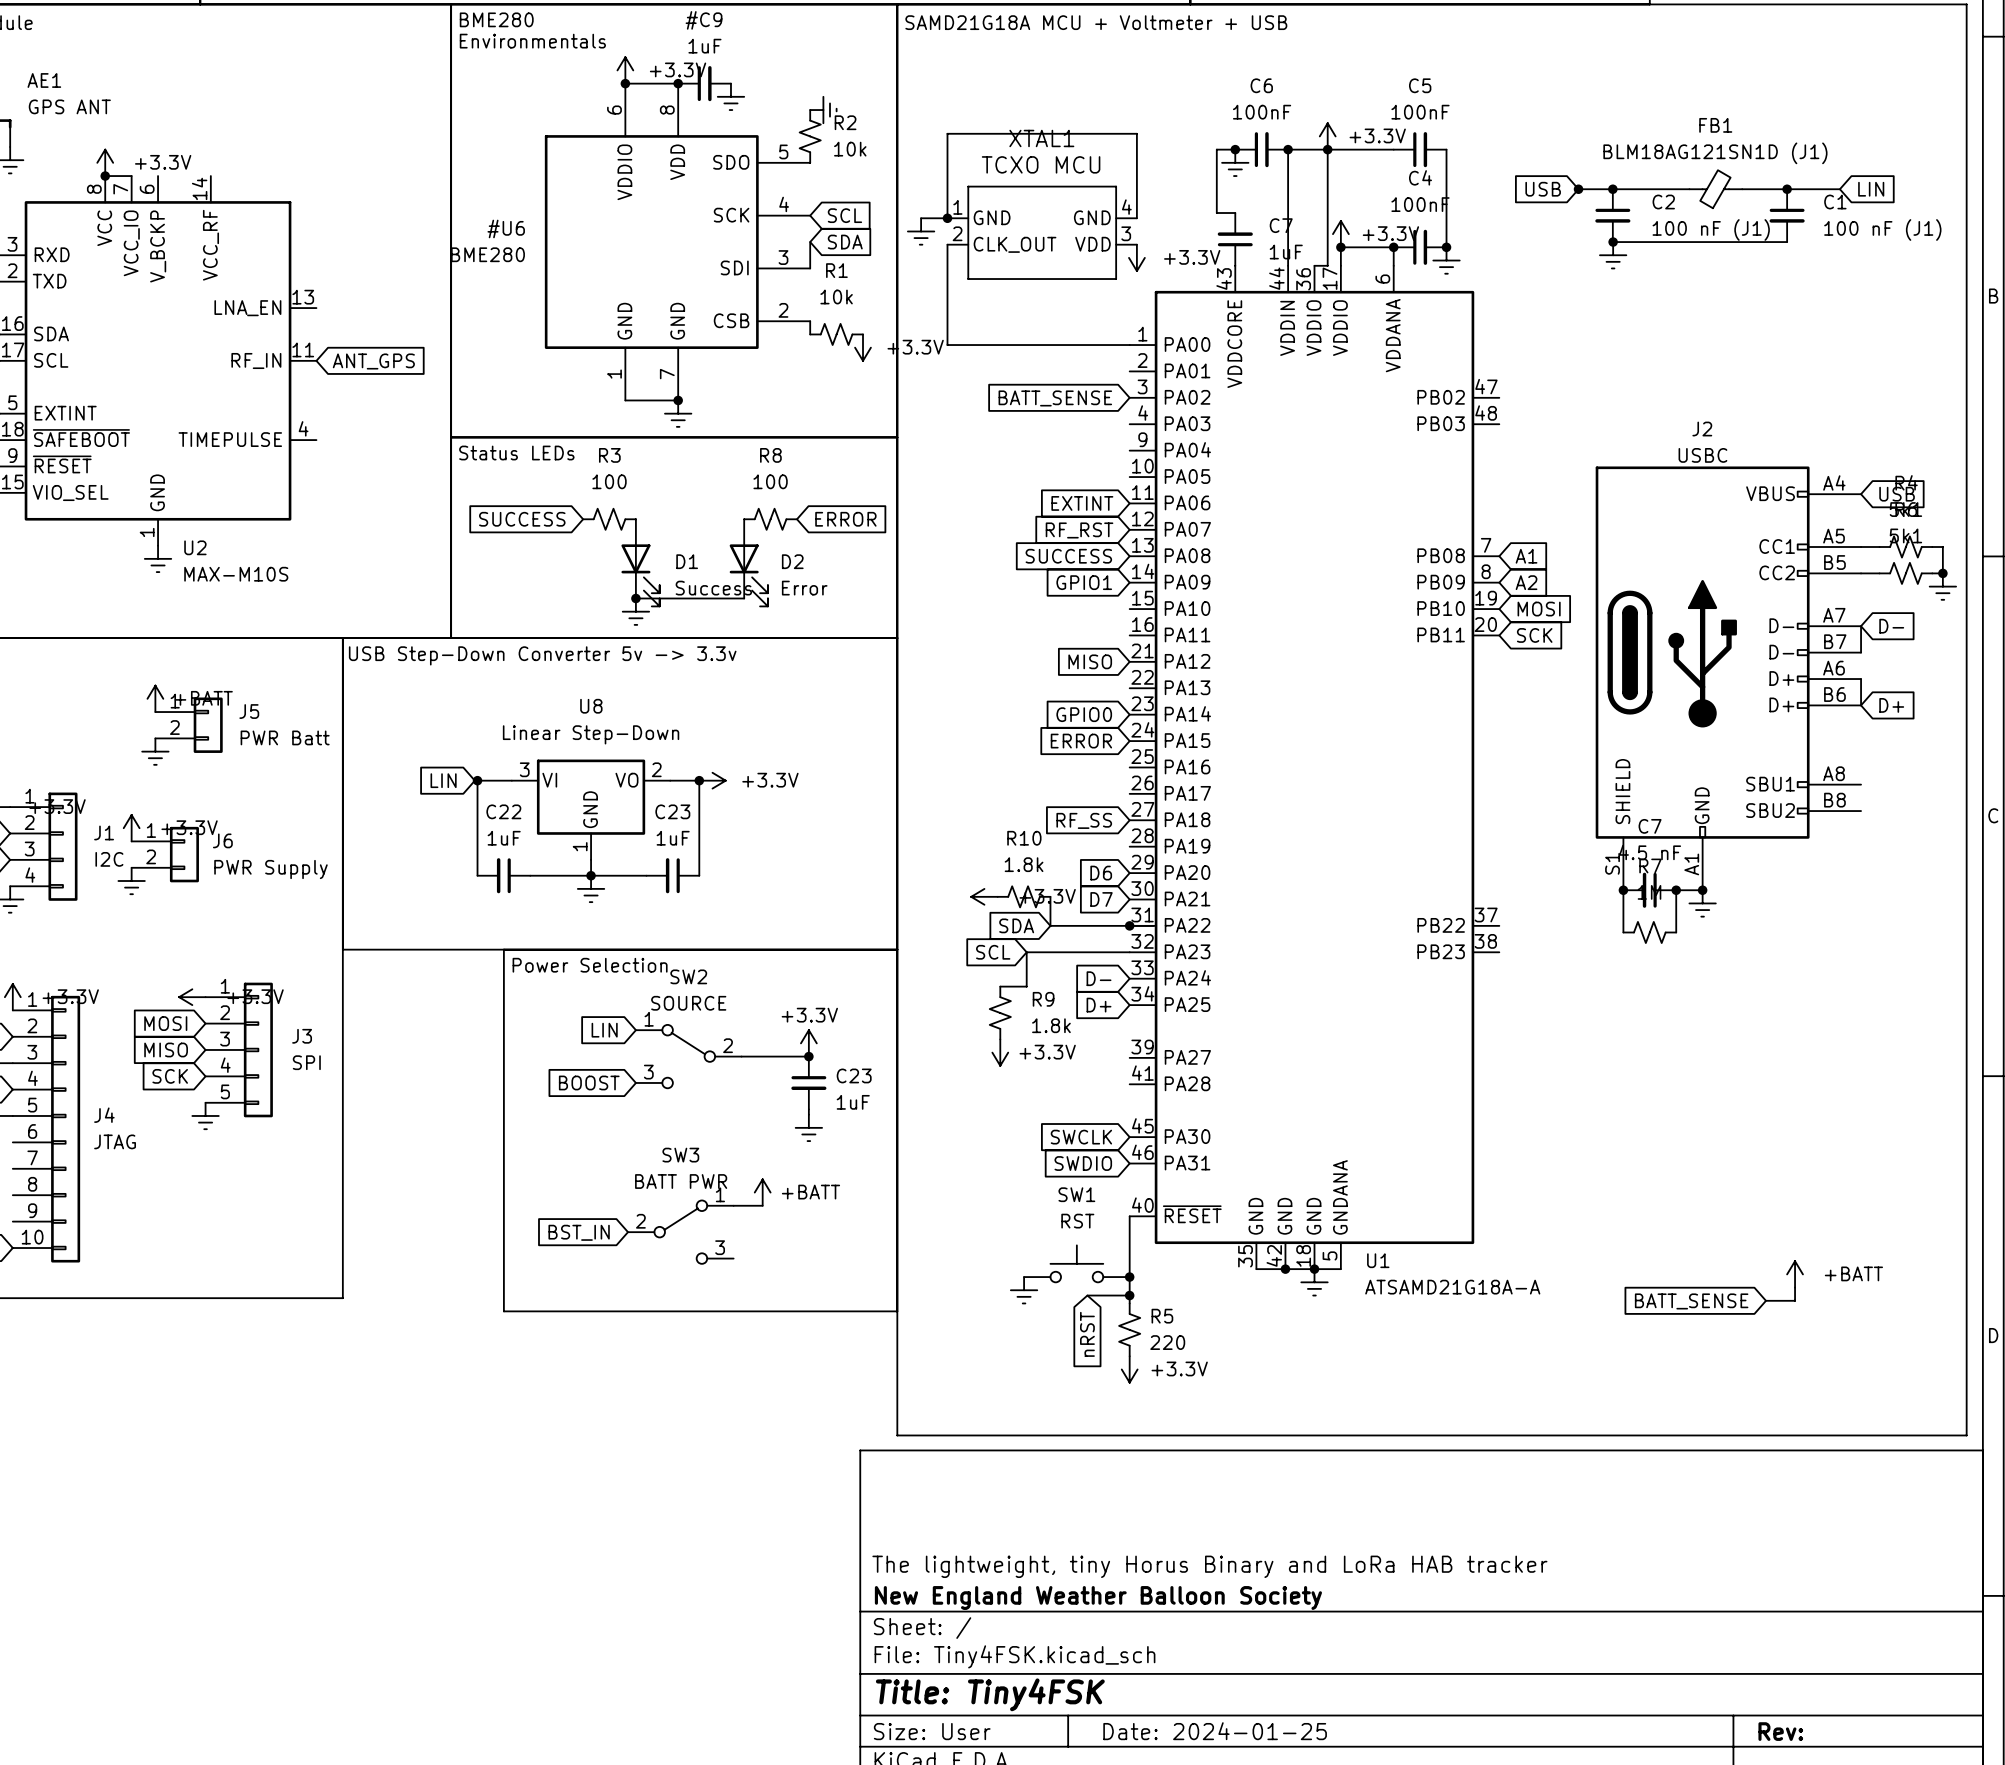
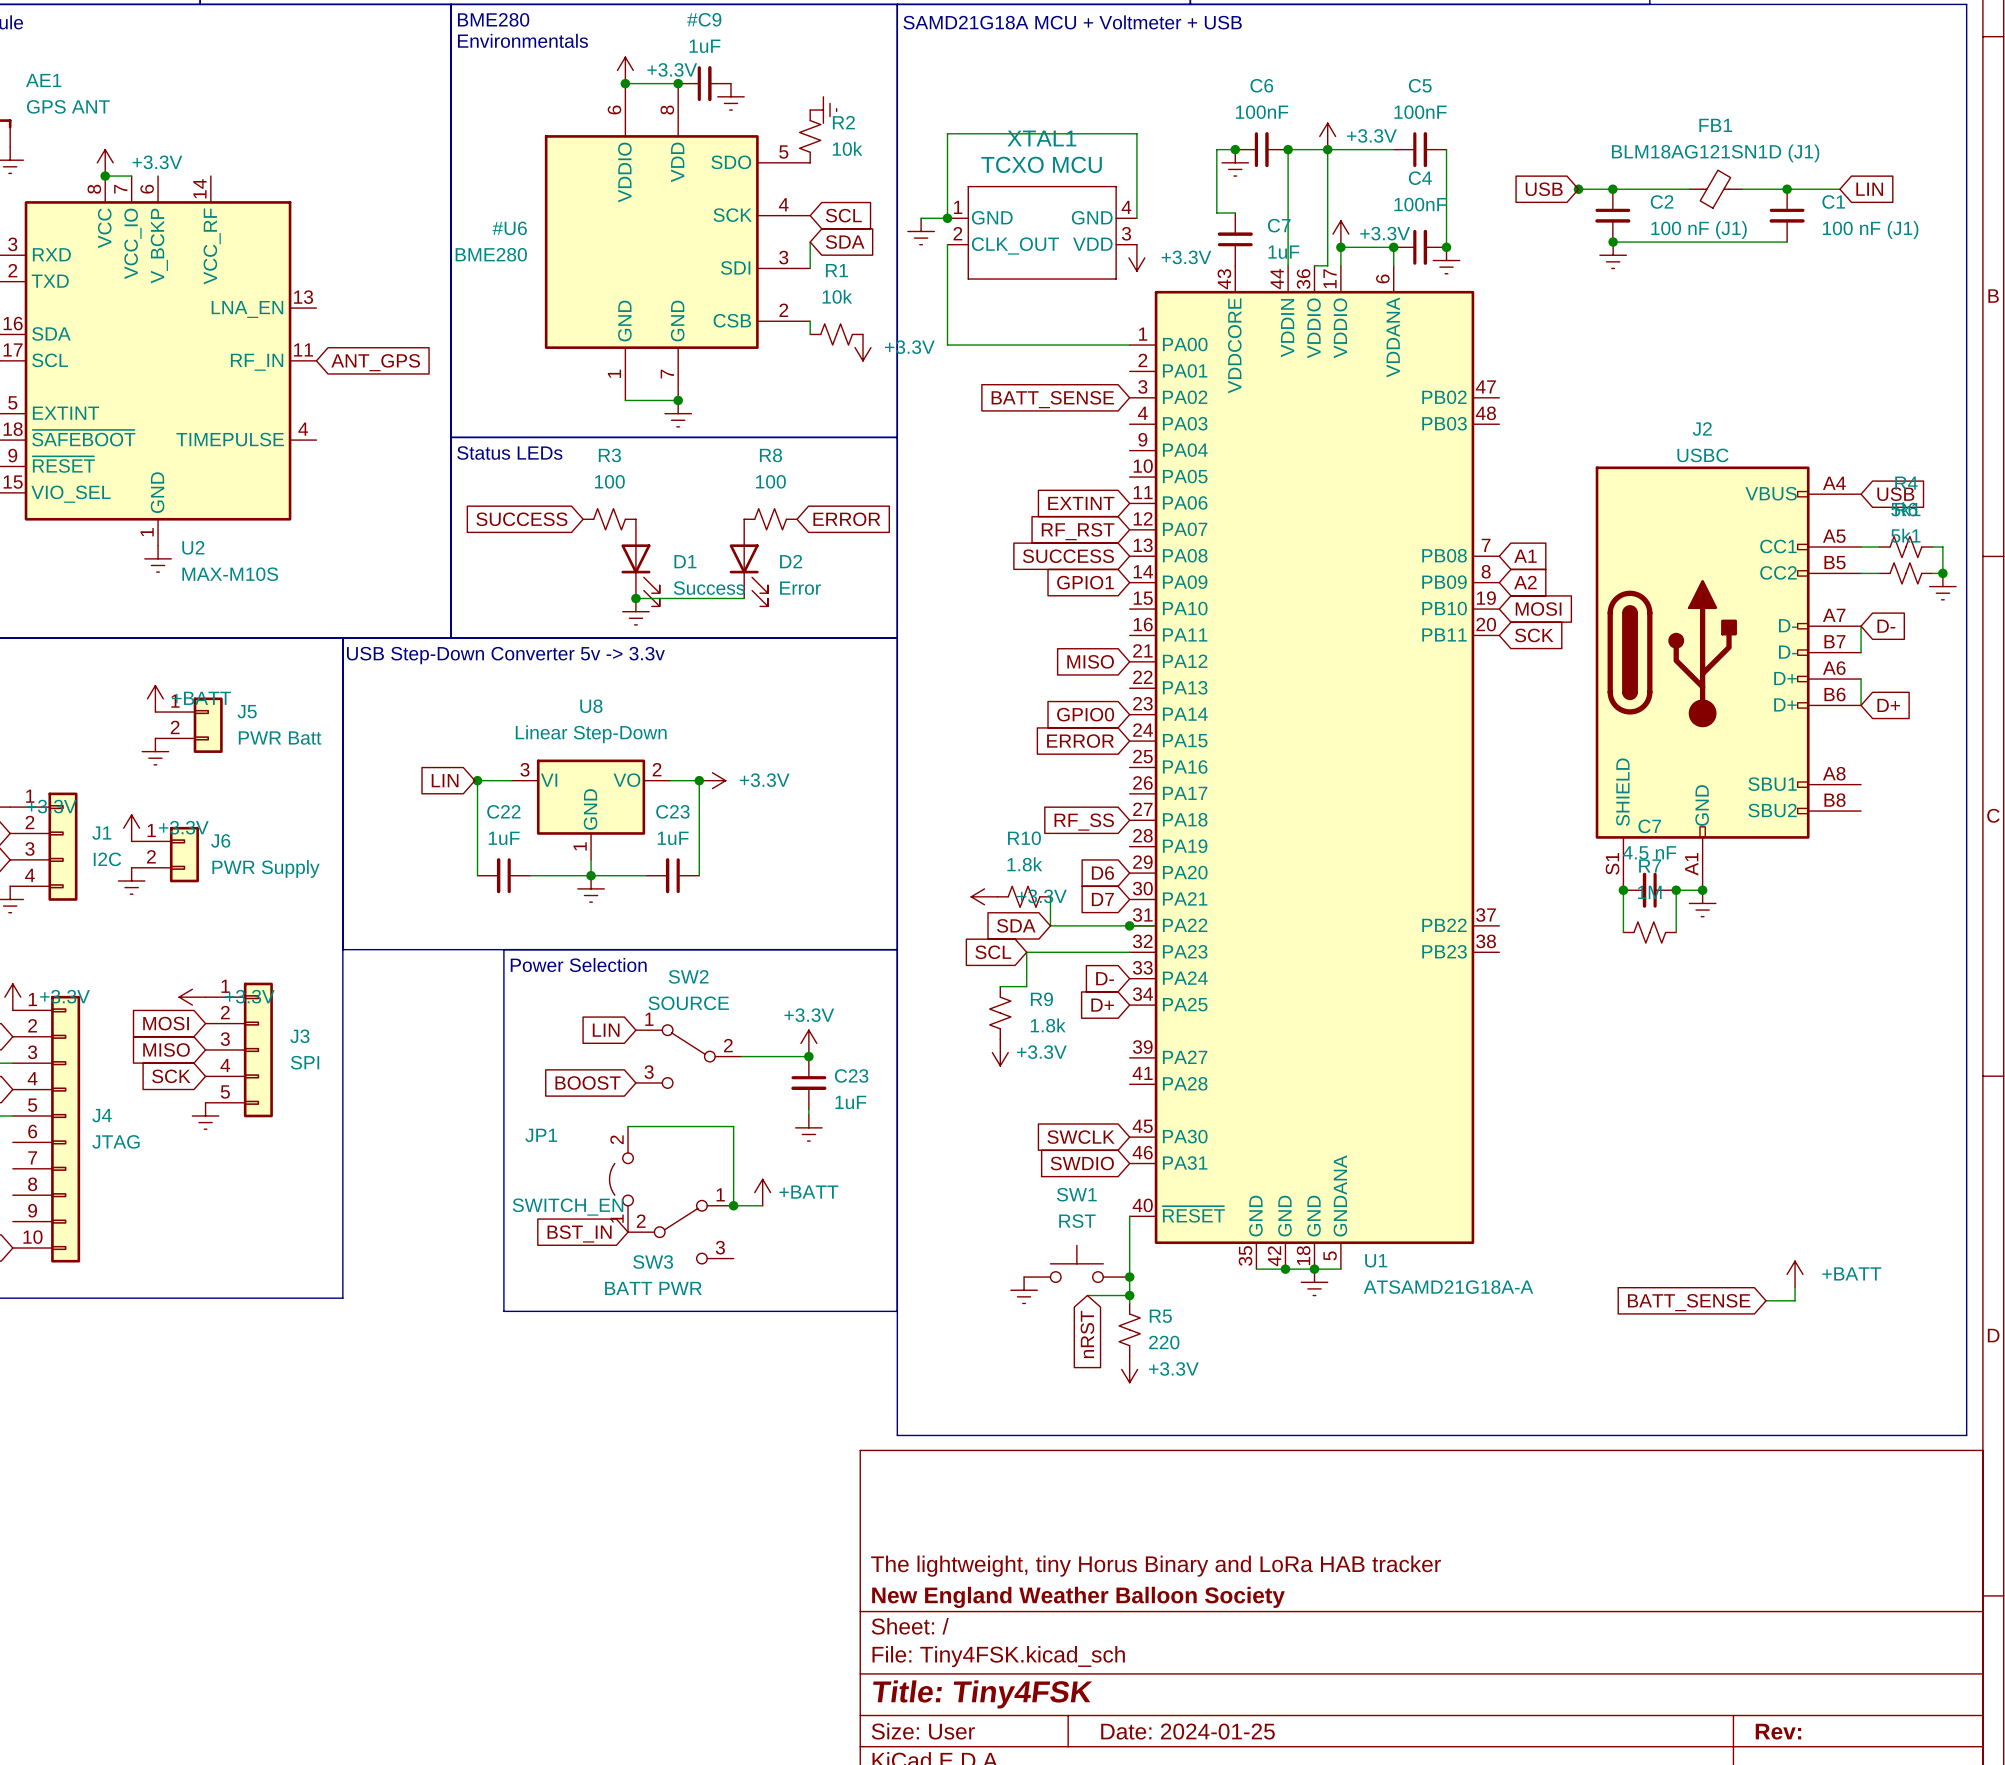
wire: none -> (628, 1126) (733, 1126) (733, 1205)
SW3 name position: SW3 (680, 1155) -> SW3 (653, 1262)
JP1: none -> SWITCH_EN (621, 1179)
SW3 value position: BATT PWR (681, 1181) -> BATT PWR (653, 1288)
junction: none -> (733, 1205)

